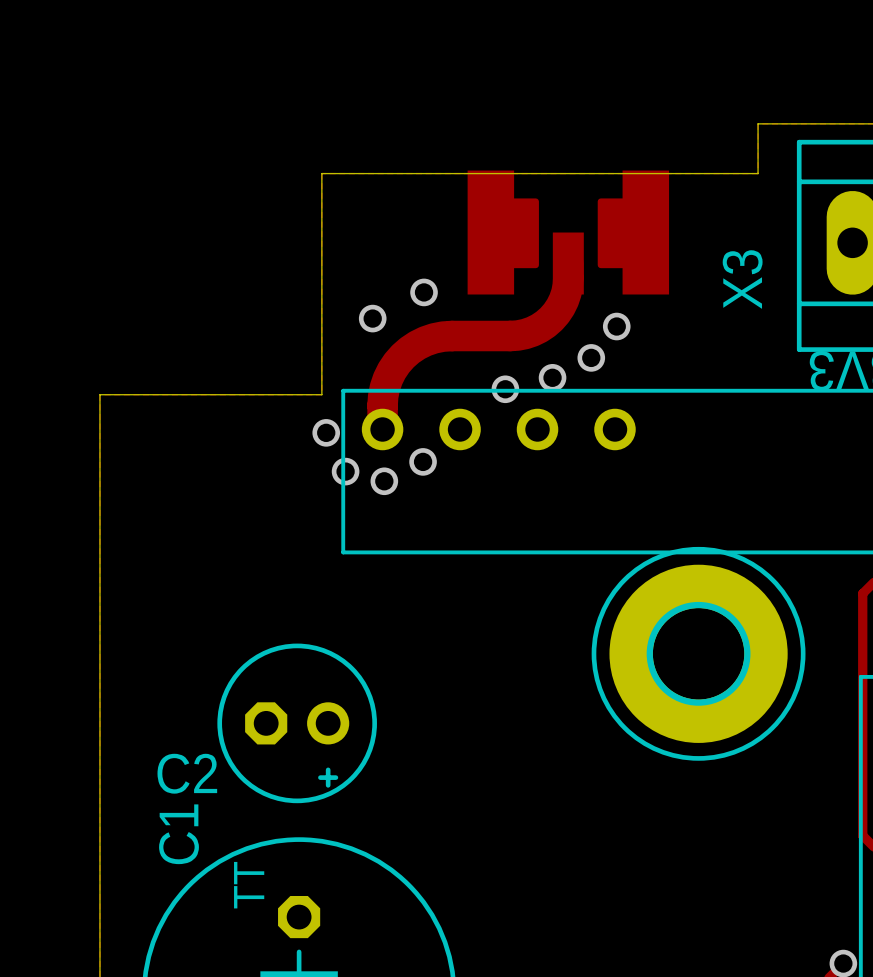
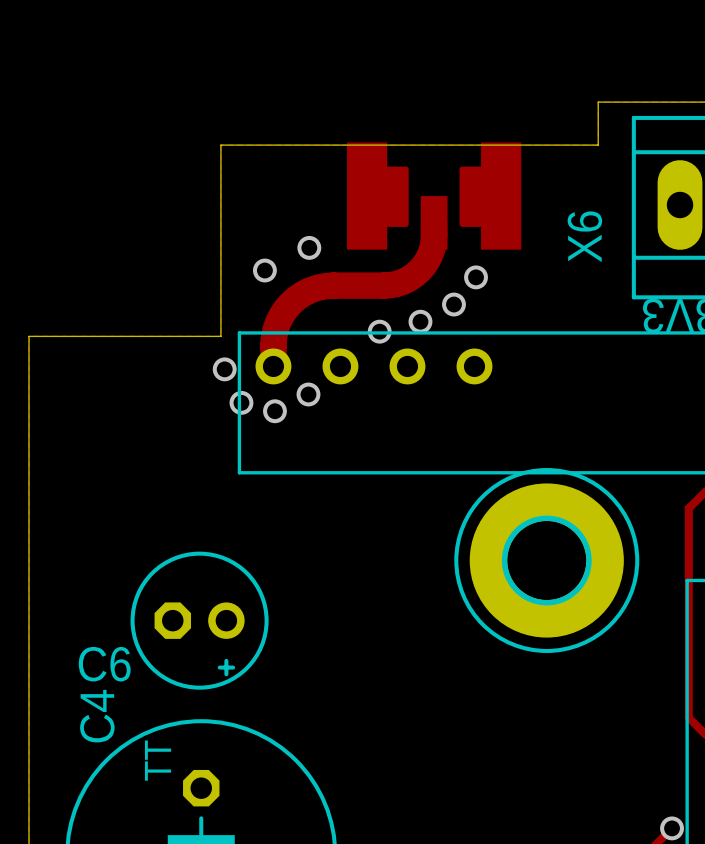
X3 name: X3 (742, 279) -> X6 (584, 236)
C2 name: C2 (187, 773) -> C6 (104, 664)
C1 name: C1 (179, 834) -> C4 (97, 716)

